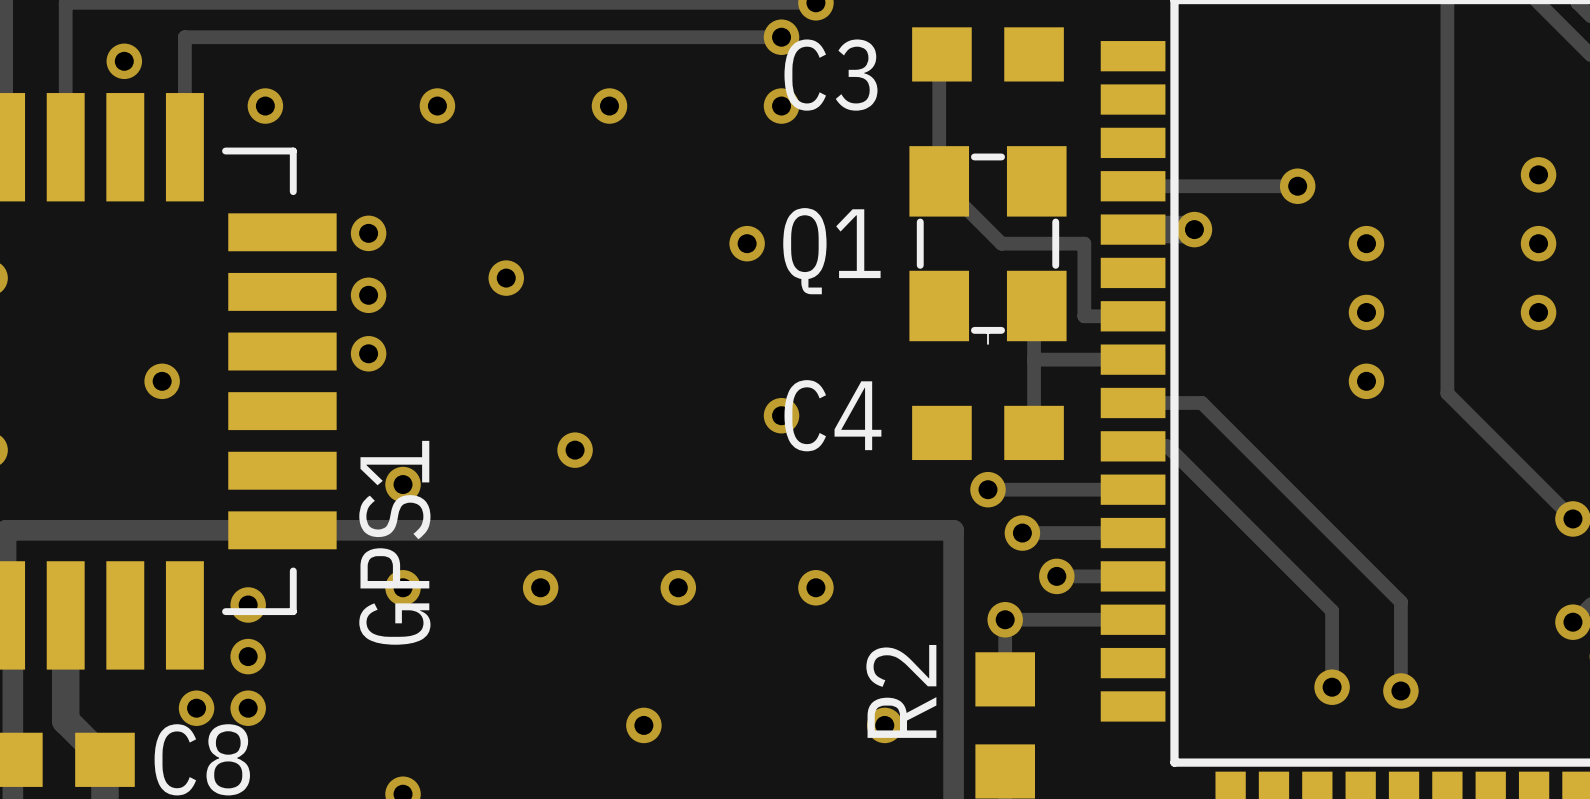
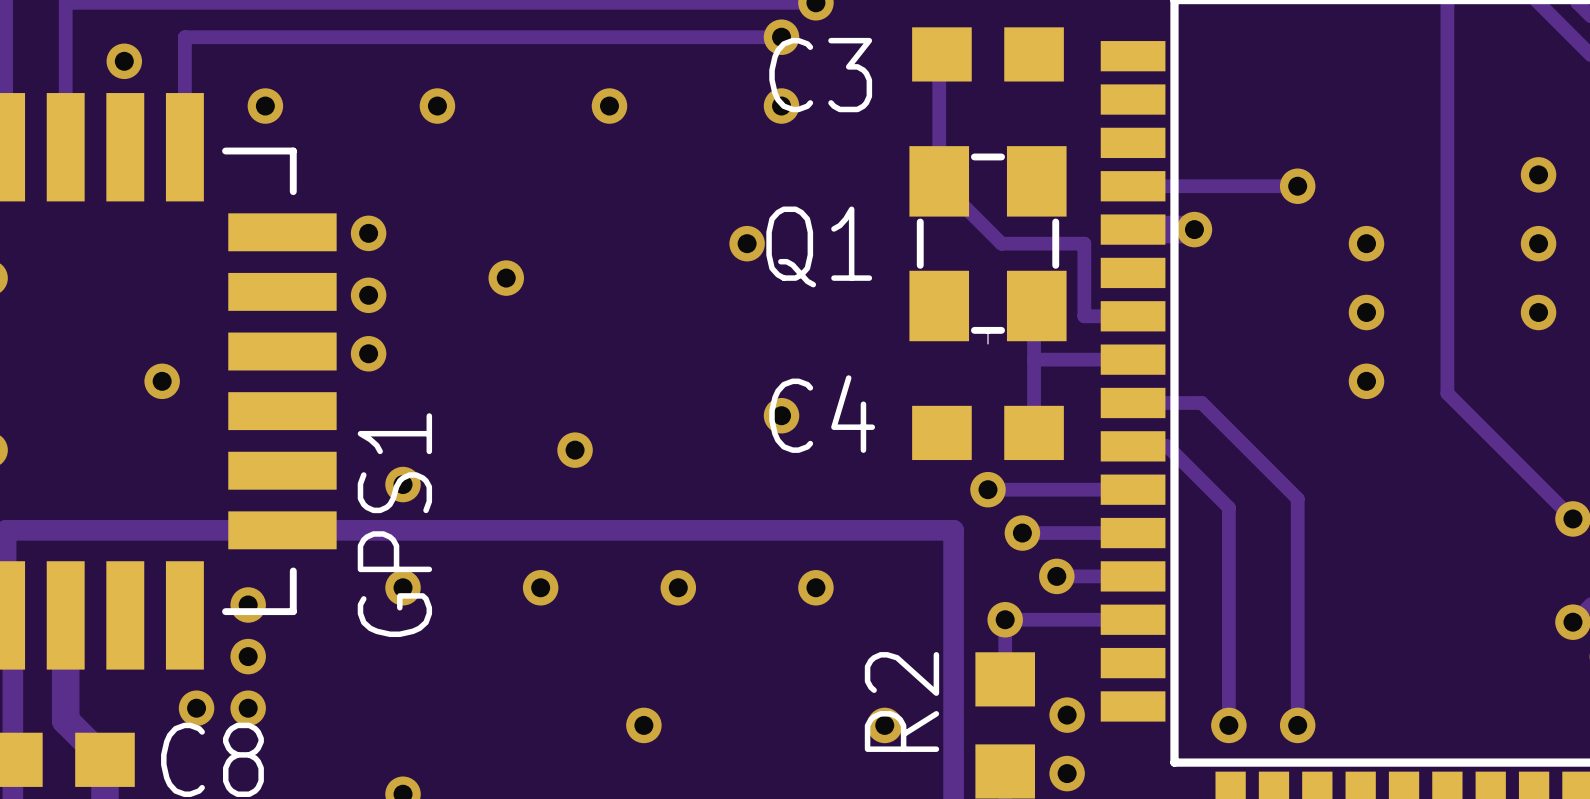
track: (1297, 498) (1400, 602) (1400, 691) -> (1297, 498) (1297, 725)
track: (1228, 507) (1332, 610) (1332, 687) -> (1228, 507) (1228, 725)
via position: (1332, 687) -> (1297, 725)
via: (1400, 691) -> none
via: none -> (1067, 715)
via: none -> (1228, 725)
via: none -> (1067, 773)

